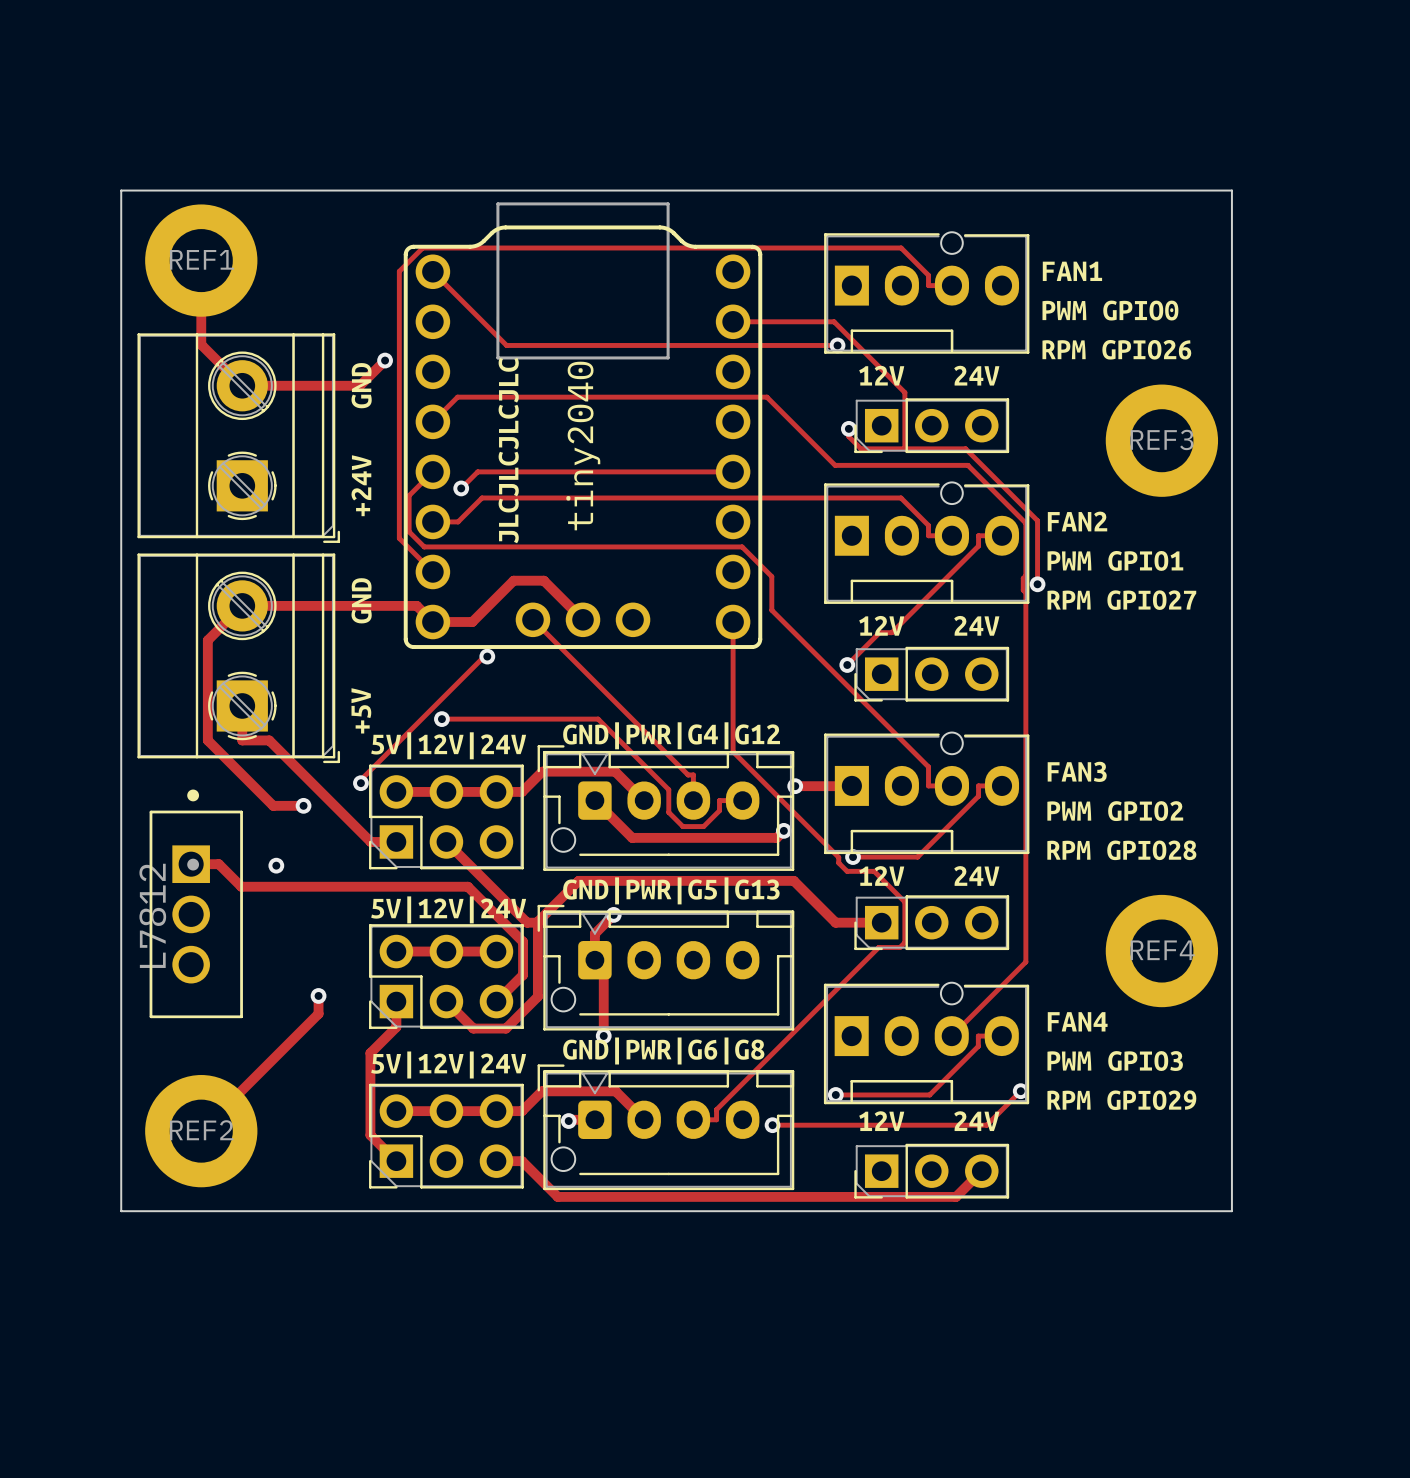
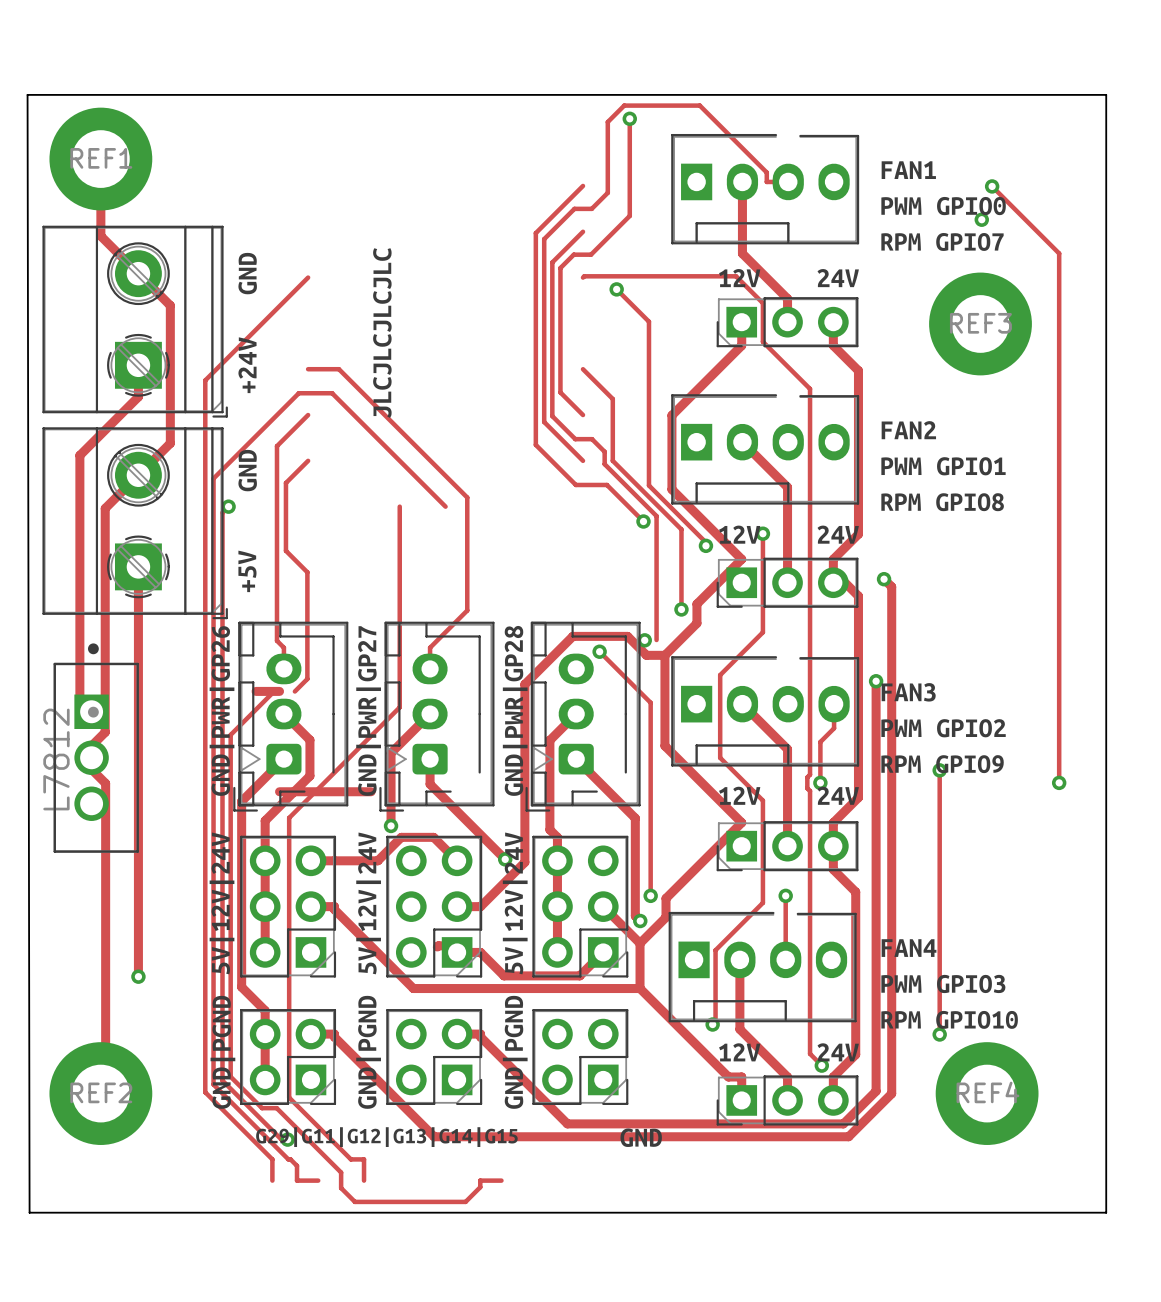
board edge: (121, 190) (121, 1211) (1231, 1211) (1231, 190) -> (27, 94) (29, 1212) (1106, 1212) (1106, 94) (1044, 94)
track: none -> (629, 118) (629, 215) (591, 254) (573, 254) (560, 268) (560, 392) (583, 415)
via: none -> (629, 118)
part footprint: [824, 232, 1030, 354] -> [671, 133, 860, 245]
track: (901, 247) (422, 247) (399, 271) (399, 538) (432, 571) -> (741, 147) (699, 105) (624, 105) (607, 122) (607, 192) (591, 208) (574, 208) (544, 239) (544, 422) (583, 460)
drawing shape: [1042, 261, 1192, 360] -> [881, 161, 1006, 251]
track: (432, 271) (506, 345) (837, 345) -> none
track: none -> (742, 181) (742, 253) (787, 298) (787, 322)
track: none -> (583, 185) (535, 233) (535, 444) (575, 484) (606, 484) (643, 521)
track: none -> (992, 186) (1059, 253) (1059, 782)
via: none -> (992, 186)
track: (733, 321) (834, 321) (904, 392) (904, 448) -> none
via: none -> (981, 219)
track: none -> (583, 231) (552, 262) (552, 416) (575, 439) (592, 439) (604, 451) (604, 464) (656, 516) (656, 640)
via: (837, 345) -> none
track: (385, 360) (359, 385) (242, 385) -> (138, 475) (170, 443) (170, 305) (138, 273)
via: (385, 360) -> none
drawing position: (881, 375) -> (739, 278)
drawing position: (976, 375) -> (838, 278)
track: none -> (308, 277) (205, 380) (205, 1092) (272, 1159) (272, 1180)
track: none -> (583, 277) (736, 276) (762, 303) (762, 341) (810, 388) (810, 774) (807, 777) (807, 788) (810, 791) (810, 1053) (821, 1065)
track: none -> (616, 289) (648, 321) (648, 485) (705, 542) (705, 545)
via: none -> (616, 289)
track: (432, 421) (457, 397) (766, 397) (835, 465) (967, 465) (1025, 523) (1025, 575) (1023, 578) (1023, 590) (1025, 592) (1025, 961) (951, 1036) -> none
part: tiny2040 (583, 425) -> none
part position: (931, 425) -> (787, 322)
track: (848, 428) (848, 436) (861, 448) (965, 448) (1037, 520) (1037, 584) -> none
via: (848, 428) -> none
track: none -> (741, 322) (741, 345) (671, 415) (671, 489) (741, 559) (696, 604) (696, 623) (664, 655)
track: none -> (833, 322) (833, 345) (858, 370) (858, 534) (833, 559) (833, 582)
track: (432, 471) (409, 495) (409, 531) (424, 546) (742, 546) (771, 576) (771, 610) (928, 766) (928, 785) (951, 785) -> none
track: (733, 471) (477, 471) (461, 488) -> none
track: none -> (138, 365) (138, 396) (79, 455) (79, 711)
via: (461, 488) -> none
track: none -> (308, 369) (338, 369) (467, 497) (467, 610) (430, 647) (430, 668)
track: none -> (583, 369) (612, 399) (612, 460) (681, 529) (681, 609)
drawing: [1047, 511, 1197, 610] -> none
track: (432, 521) (458, 521) (482, 497) (900, 497) (928, 525) (928, 535) (951, 535) -> none
track: (1001, 535) (978, 535) (978, 546) (891, 632) (879, 632) (847, 665) -> none
track: none -> (308, 415) (276, 446) (276, 640) (283, 647) (283, 668)
part: (926, 543) -> none
drawing: none -> [881, 421, 1006, 512]
track: none -> (742, 442) (787, 487) (787, 582)
part: none -> (765, 449)
via: (1037, 584) -> none
track: none -> (308, 460) (285, 483) (285, 550) (307, 572) (307, 679) (294, 691)
track: (242, 605) (416, 605) (432, 621) (472, 621) (513, 580) (543, 580) (583, 619) -> none
track: (532, 619) (688, 774) (693, 774) (693, 800) -> none
track: (733, 621) (733, 751) (838, 857) (838, 862) (847, 871) (874, 871) (904, 902) (904, 942) (899, 947) (878, 947) (716, 1109) (716, 1119) (693, 1119) -> none
drawing position: (881, 625) -> (739, 534)
drawing position: (976, 625) -> (838, 534)
track: (207, 640) (207, 740) (273, 805) (303, 805) -> (106, 506) (105, 508) (105, 732) (79, 757) (105, 783) (105, 1088) (100, 1093)
track: none -> (228, 506) (222, 512) (222, 1080) (281, 1139) (287, 1139)
via: none -> (228, 506)
track: none -> (399, 506) (399, 707) (289, 817) (289, 1097) (350, 1159) (364, 1159) (364, 1180)
track: none -> (445, 506) (332, 393) (298, 393) (213, 478) (213, 1084) (297, 1165) (297, 1180) (318, 1180)
track: (487, 656) (484, 656) (360, 779) (360, 783) -> none
via: (487, 656) -> none
via: none -> (643, 521)
via position: (847, 665) -> (705, 545)
track: none -> (762, 533) (762, 632) (720, 675) (720, 757) (762, 800) (762, 902) (715, 950) (715, 1021) (712, 1024)
via: none -> (762, 533)
part position: (931, 674) -> (787, 582)
track: none -> (833, 571) (858, 596) (858, 797) (833, 822) (833, 869) (855, 892) (855, 1054) (833, 1076) (833, 1100)
track: (441, 719) (598, 719) (668, 789) (668, 812) (682, 826) (703, 826) (719, 810) (719, 800) (742, 800) -> none
via: (441, 719) -> none
track: none -> (884, 579) (891, 586) (891, 1093) (848, 1136) (434, 1136) (334, 1037) (334, 1034) (310, 1034)
via: none -> (884, 579)
drawing: [563, 722, 781, 750] -> none
drawing: [371, 732, 527, 760] -> none
track: (242, 740) (269, 740) (370, 841) -> (138, 598) (138, 976)
via: none -> (681, 609)
drawing: [1047, 761, 1197, 861] -> none
drawing: none -> [209, 626, 235, 796]
drawing: none -> [356, 626, 381, 796]
drawing: none -> [502, 625, 528, 796]
via: (360, 783) -> none
track: (1001, 785) (978, 785) (978, 796) (917, 857) (853, 857) -> none
track: (795, 786) (851, 786) -> none
track: (396, 791) (522, 791) (542, 771) (615, 771) (644, 800) -> none
part: (926, 793) -> none
track: none -> (599, 651) (650, 702) (650, 895)
via: none -> (599, 651)
track: (594, 800) (632, 837) (776, 837) (783, 830) -> none
track: none -> (664, 655) (664, 745) (741, 822) (666, 898) (666, 917) (640, 943)
track: none -> (664, 655) (646, 655) (627, 636) (572, 636) (524, 684) (524, 862) (480, 906) (457, 906)
via: (303, 805) -> none
part: (665, 808) -> none
part: (446, 816) -> none
via: (783, 830) -> none
track: none -> (876, 681) (876, 1091) (843, 1123) (567, 1123) (480, 1037) (480, 1034) (457, 1034)
via: none -> (876, 681)
drawing: none -> [881, 683, 1006, 774]
track: (446, 841) (527, 922) (537, 922) -> none
track: none -> (274, 691) (230, 734) (230, 1076) (262, 1108) (276, 1108) (341, 1172) (341, 1188) (354, 1201) (465, 1201) (480, 1187) (480, 1180) (501, 1180)
track: none -> (742, 704) (787, 749) (787, 846)
track: none -> (834, 704) (834, 728) (820, 742) (820, 782)
via: (853, 857) -> none
part: none -> (765, 711)
track: (191, 864) (218, 864) (241, 886) (467, 886) (523, 941) (523, 975) (496, 1001) -> none
via: (276, 865) -> none
track: none -> (283, 714) (309, 740) (309, 776) (265, 820) (265, 952)
track: none -> (430, 714) (391, 753) (391, 825)
track: none -> (576, 714) (549, 740) (549, 829) (557, 837) (557, 952)
drawing: [954, 866, 1000, 886] -> none
part: none -> (290, 716)
part: none -> (436, 716)
part: none -> (583, 716)
drawing position: (881, 875) -> (739, 795)
drawing: [563, 877, 780, 905] -> none
drawing: [371, 896, 527, 924] -> none
track: (613, 914) (594, 933) (594, 960) (603, 969) (603, 1035) -> none
via: (613, 914) -> none
track: none -> (283, 759) (241, 801) (241, 987) (265, 1010) (265, 1079)
track: none -> (430, 759) (430, 784) (505, 859)
track: none -> (576, 759) (635, 818) (635, 916) (640, 921)
track: (881, 922) (835, 922) (793, 880) (578, 880) (537, 921) (537, 996) (506, 1028) (473, 1028) (446, 1001) -> none
part: (931, 922) -> none
track: none -> (939, 770) (939, 1034)
via: none -> (939, 770)
via: none -> (820, 782)
via: none -> (1059, 782)
drawing: none -> [817, 786, 859, 805]
REF4 position: (1161, 951) -> (987, 1093)
part: (665, 967) -> none
part: (446, 976) -> none
via: none -> (391, 825)
track: (318, 995) (318, 1013) (201, 1131) -> none
via: (318, 995) -> none
drawing: none -> [209, 832, 236, 1109]
drawing: none -> [256, 832, 528, 1147]
track: (396, 1001) (396, 1027) (370, 1053) (370, 1135) (396, 1161) -> none
part: none -> (787, 846)
drawing: [1047, 1012, 1197, 1111] -> none
track: none -> (310, 860) (377, 860) (401, 837) (433, 837) (457, 860)
via position: (603, 1035) -> (505, 859)
track: (1001, 1036) (978, 1036) (978, 1046) (929, 1094) (835, 1094) -> none
drawing: [563, 1037, 765, 1065] -> none
part: (926, 1043) -> none
drawing: [371, 1051, 527, 1079] -> none
via: none -> (650, 895)
track: none -> (785, 895) (785, 959)
via: none -> (785, 895)
part: none -> (288, 906)
track: none -> (310, 906) (334, 906) (334, 909) (413, 988) (640, 988)
part: none -> (434, 906)
part: none -> (580, 906)
track: none -> (603, 906) (640, 943)
track: (1020, 1091) (986, 1125) (772, 1125) -> none
via: (1020, 1091) -> none
via: none -> (640, 921)
via: (835, 1094) -> none
track: (396, 1111) (522, 1111) (541, 1091) (615, 1091) (644, 1119) -> none
drawing: [859, 1111, 905, 1132] -> none
drawing: [954, 1111, 1000, 1132] -> none
drawing: none -> [881, 939, 1018, 1029]
track: none -> (640, 943) (640, 988)
via: (568, 1121) -> none
via: (772, 1125) -> none
track: none -> (457, 952) (480, 952) (504, 975) (579, 975) (603, 952)
part: (665, 1127) -> none
REF2 position: (201, 1131) -> (100, 1093)
track: none -> (739, 959) (739, 1029) (787, 1076) (787, 1100)
part: (446, 1136) -> none
part: none -> (762, 967)
via: none -> (138, 976)
track: (496, 1161) (522, 1161) (557, 1196) (956, 1196) (981, 1171) -> none
track: none -> (640, 988) (728, 1076) (741, 1076) (741, 1100)
part: (931, 1171) -> none
via: none -> (712, 1024)
via: none -> (939, 1034)
drawing: none -> [719, 1043, 761, 1062]
drawing: none -> [817, 1043, 859, 1062]
part: none -> (288, 1057)
part: none -> (434, 1057)
part: none -> (580, 1057)
via: none -> (821, 1065)
part: none -> (787, 1100)
drawing: none -> [620, 1128, 662, 1147]
via: none -> (287, 1139)

